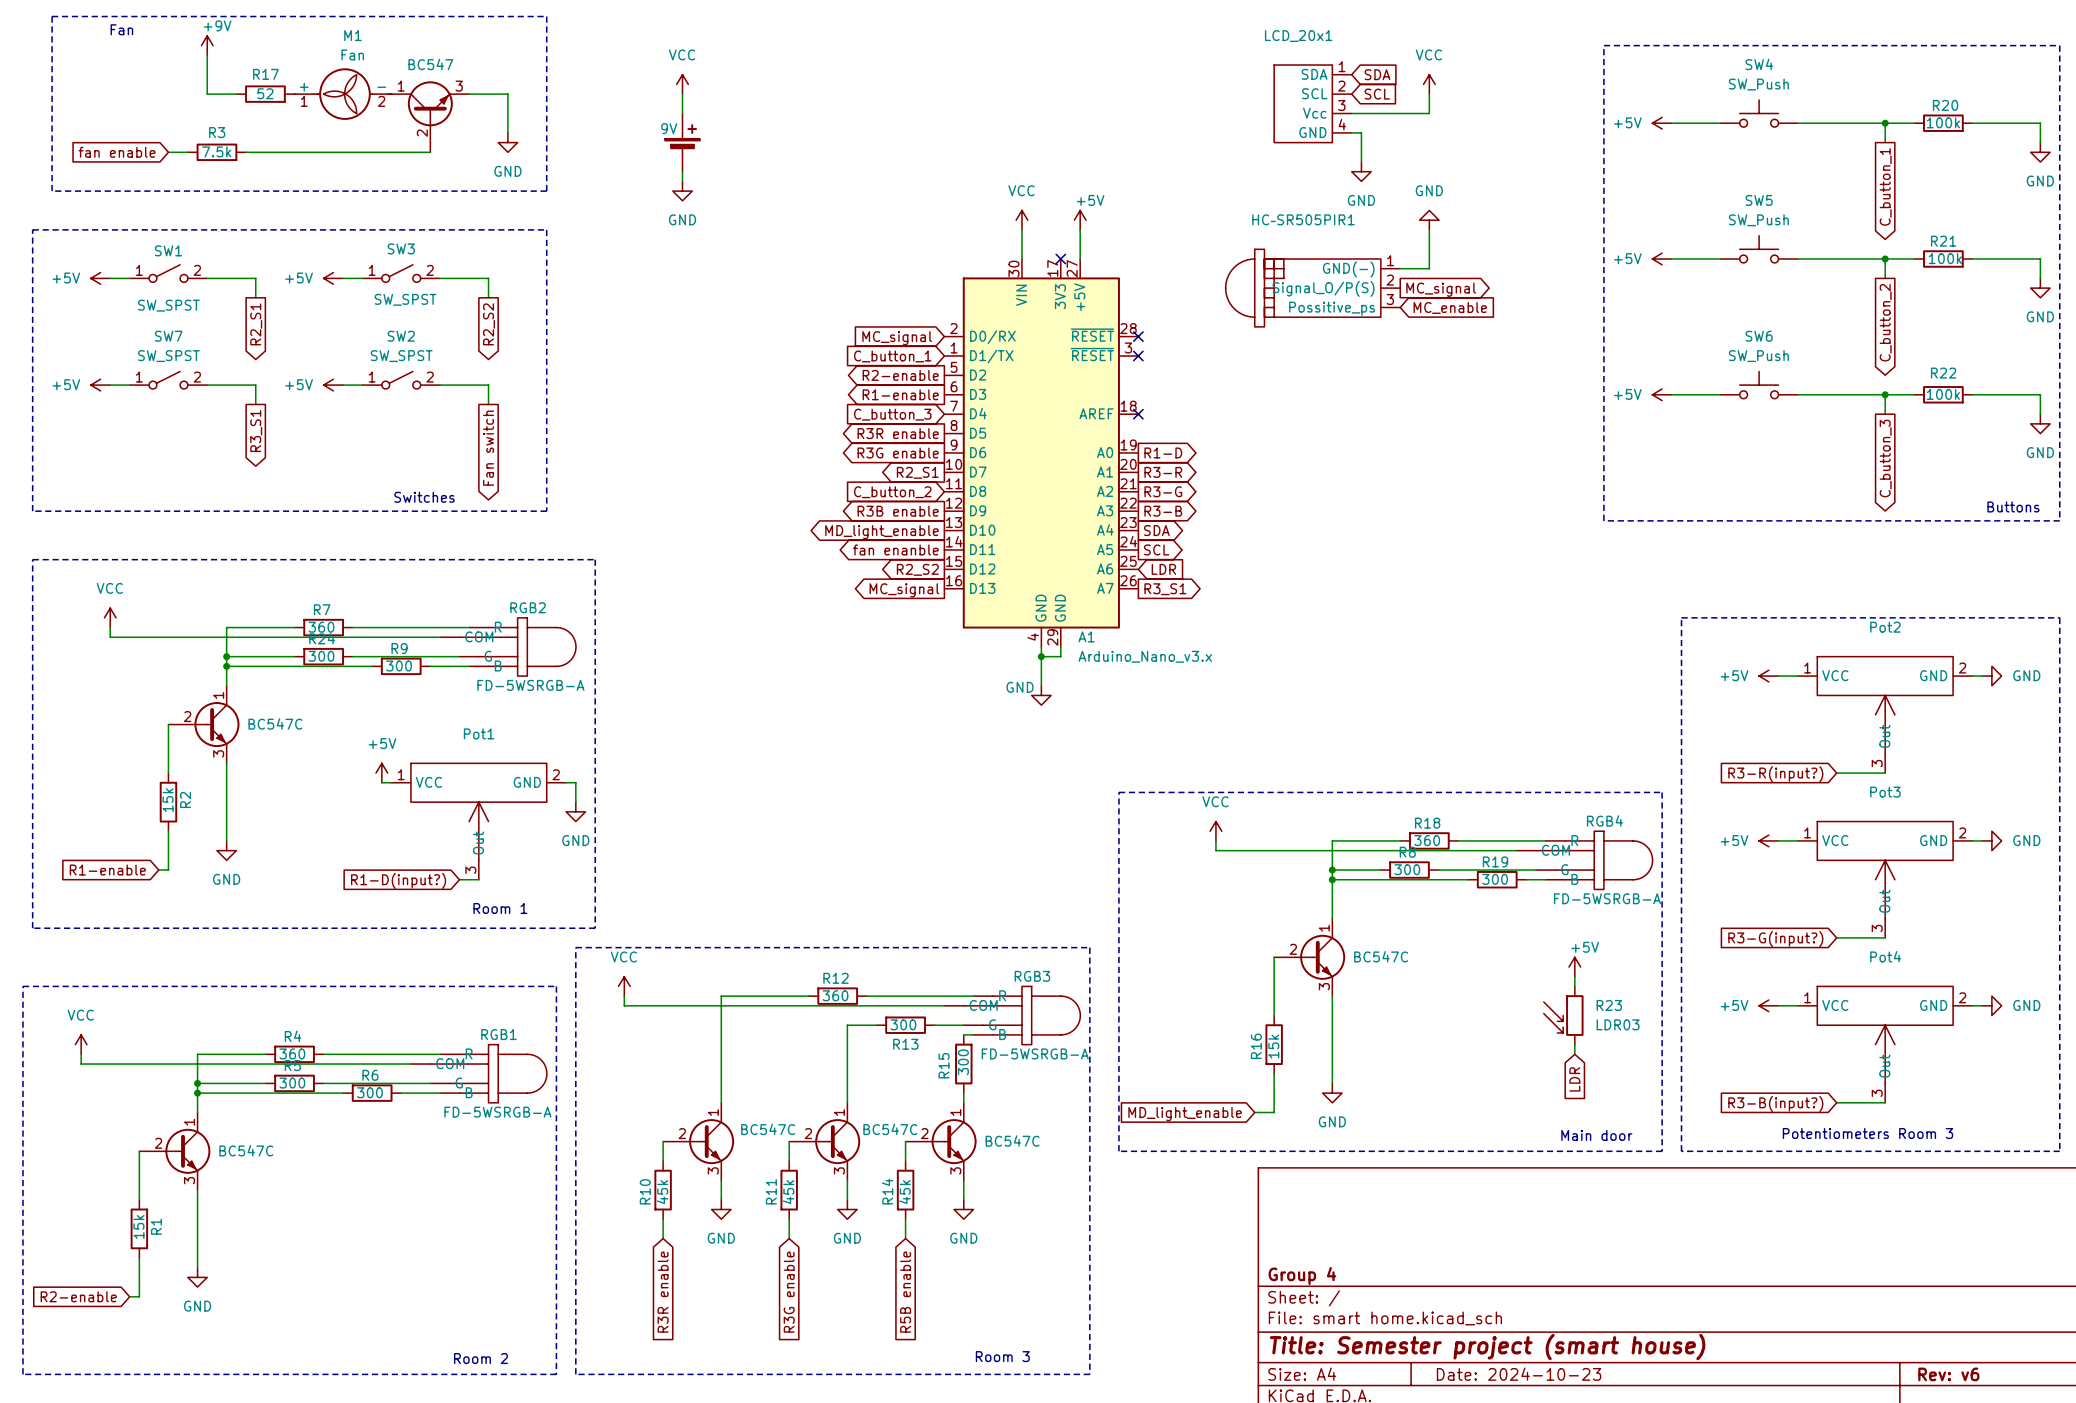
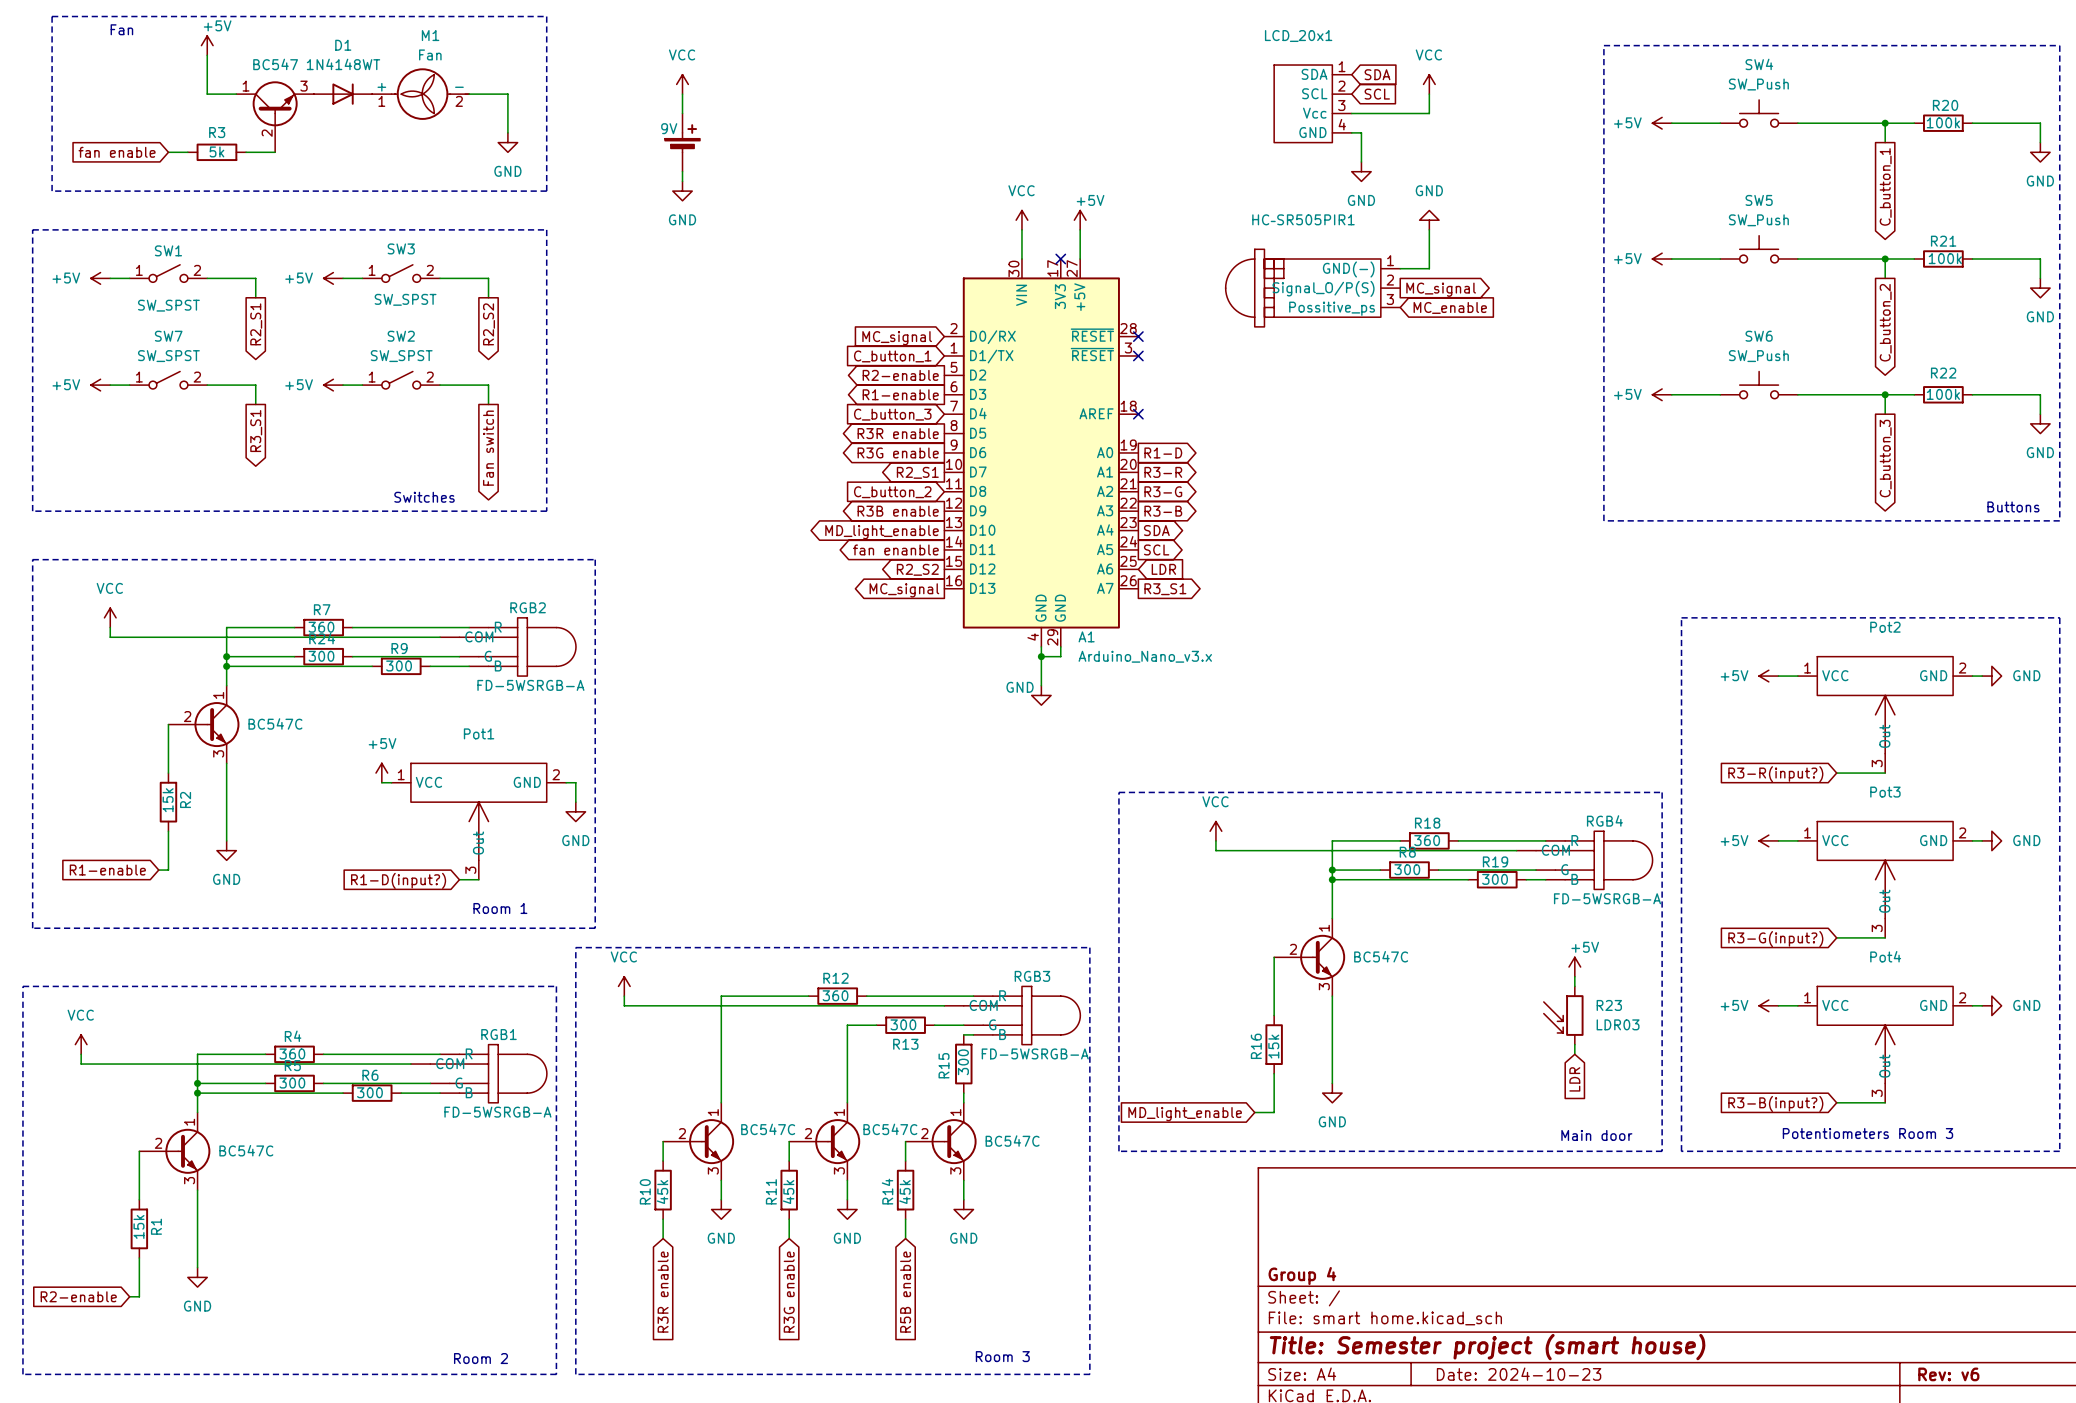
power symbol: +9V (207, 45) -> +5V (207, 45)
R17: 52 (265, 94) -> none
M1 position: (343, 94) -> (420, 94)
D1: none -> 1N4148WT (343, 94)
part position: (430, 116) -> (275, 116)
R3 value: 7.5k (216, 151) -> 5k (216, 151)
wire: (275, 152) (430, 152) -> none

